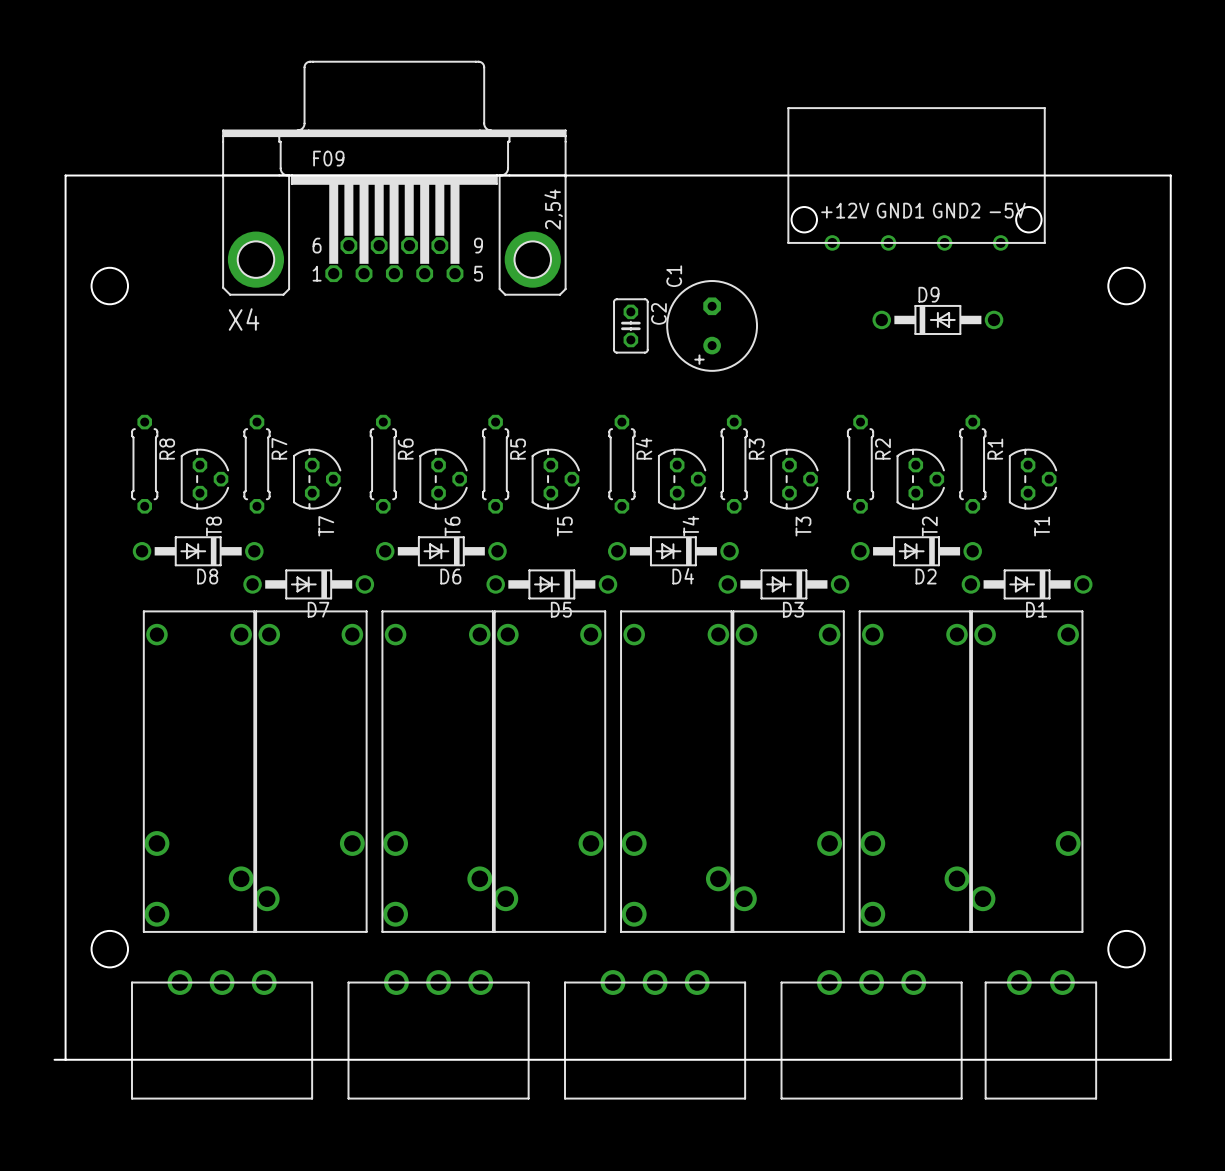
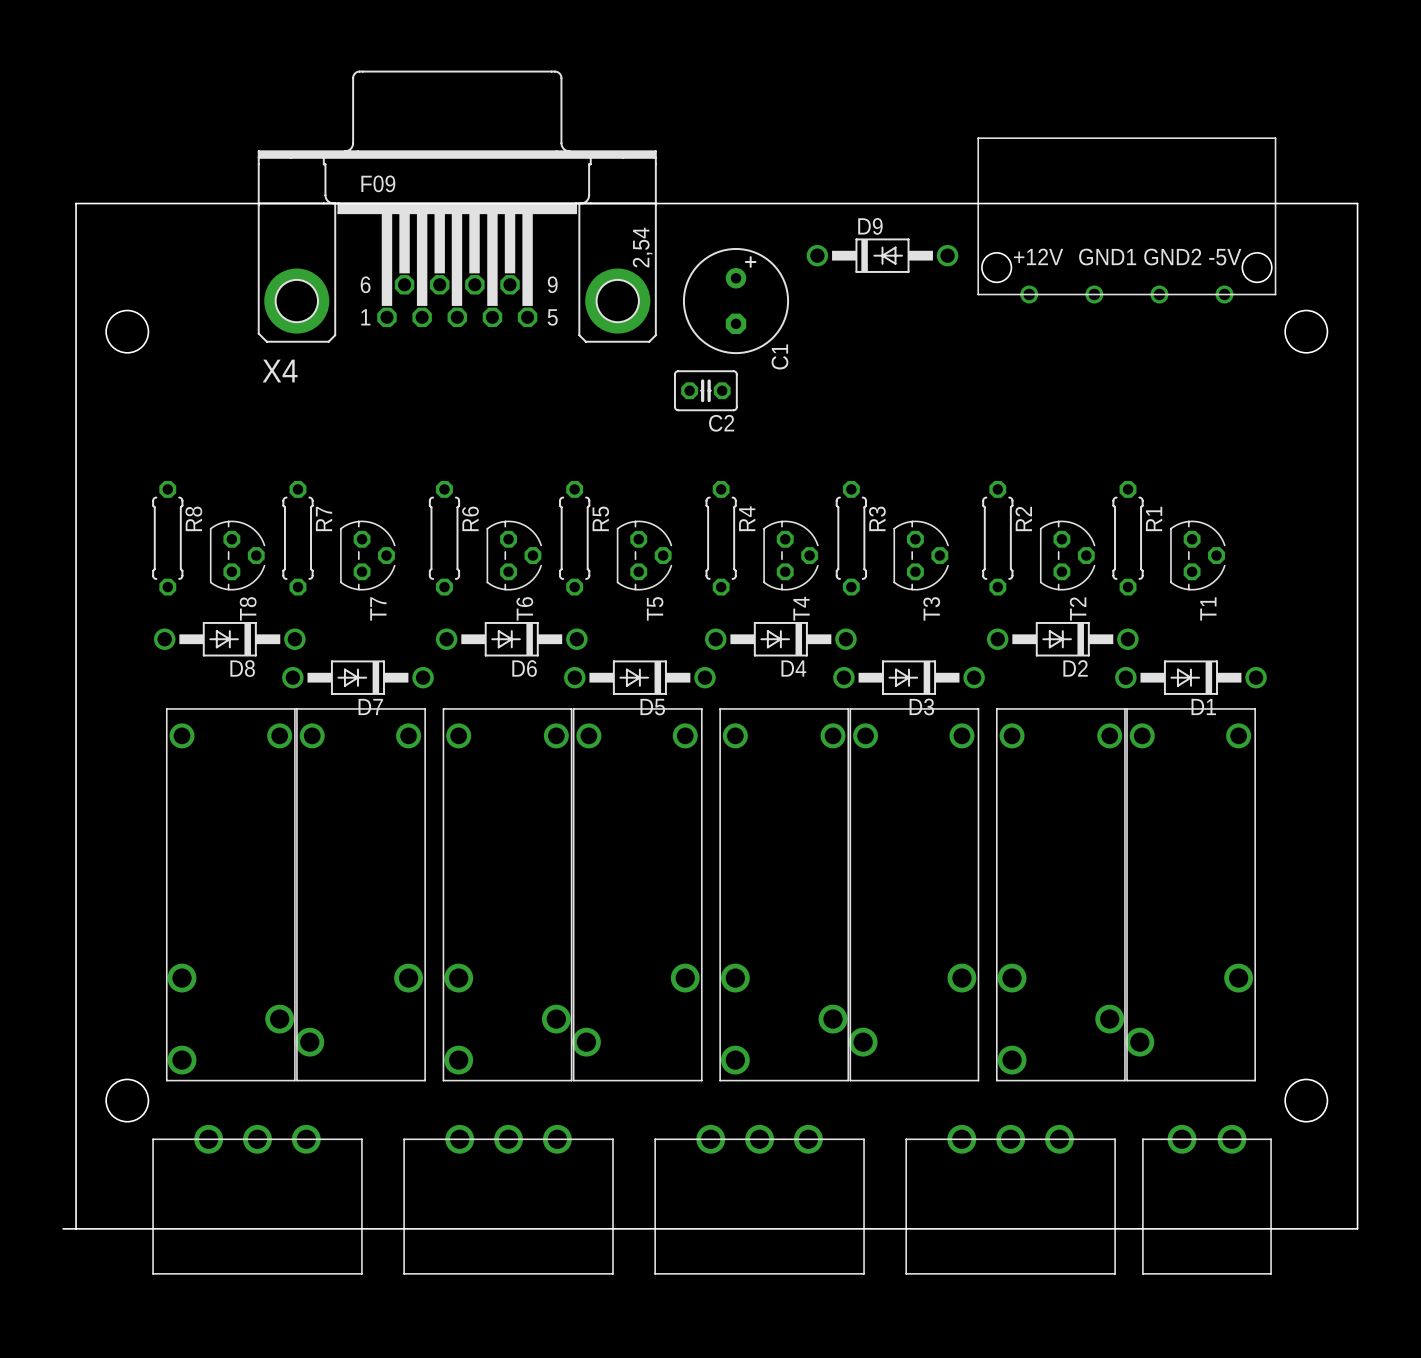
part position: (916, 179) -> (1126, 220)
D9 position: (937, 319) -> (882, 255)
C2 rotation: 0° (630, 325) -> 90° clockwise (705, 390)
C1 rotation: 0° (712, 325) -> 180° (736, 301)
C1 position: (712, 325) -> (736, 301)

